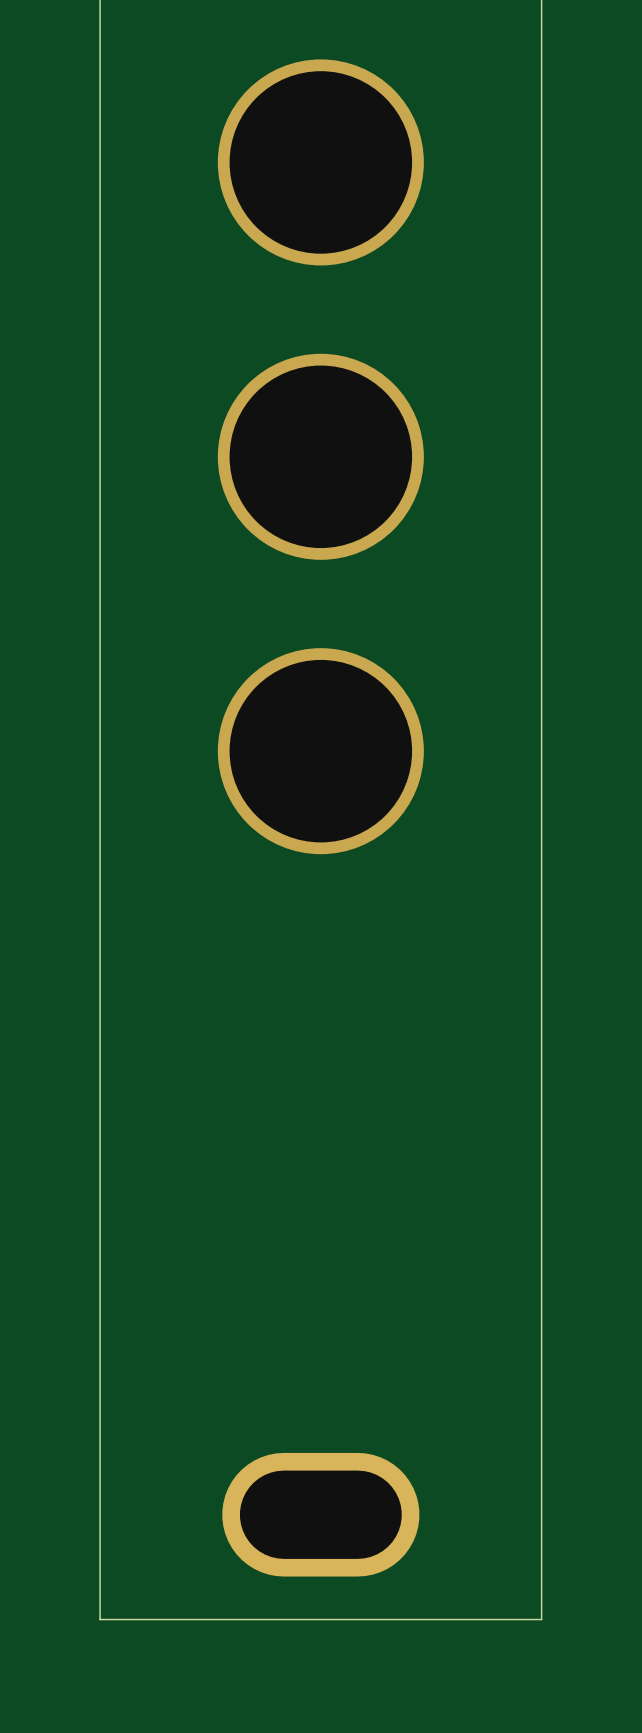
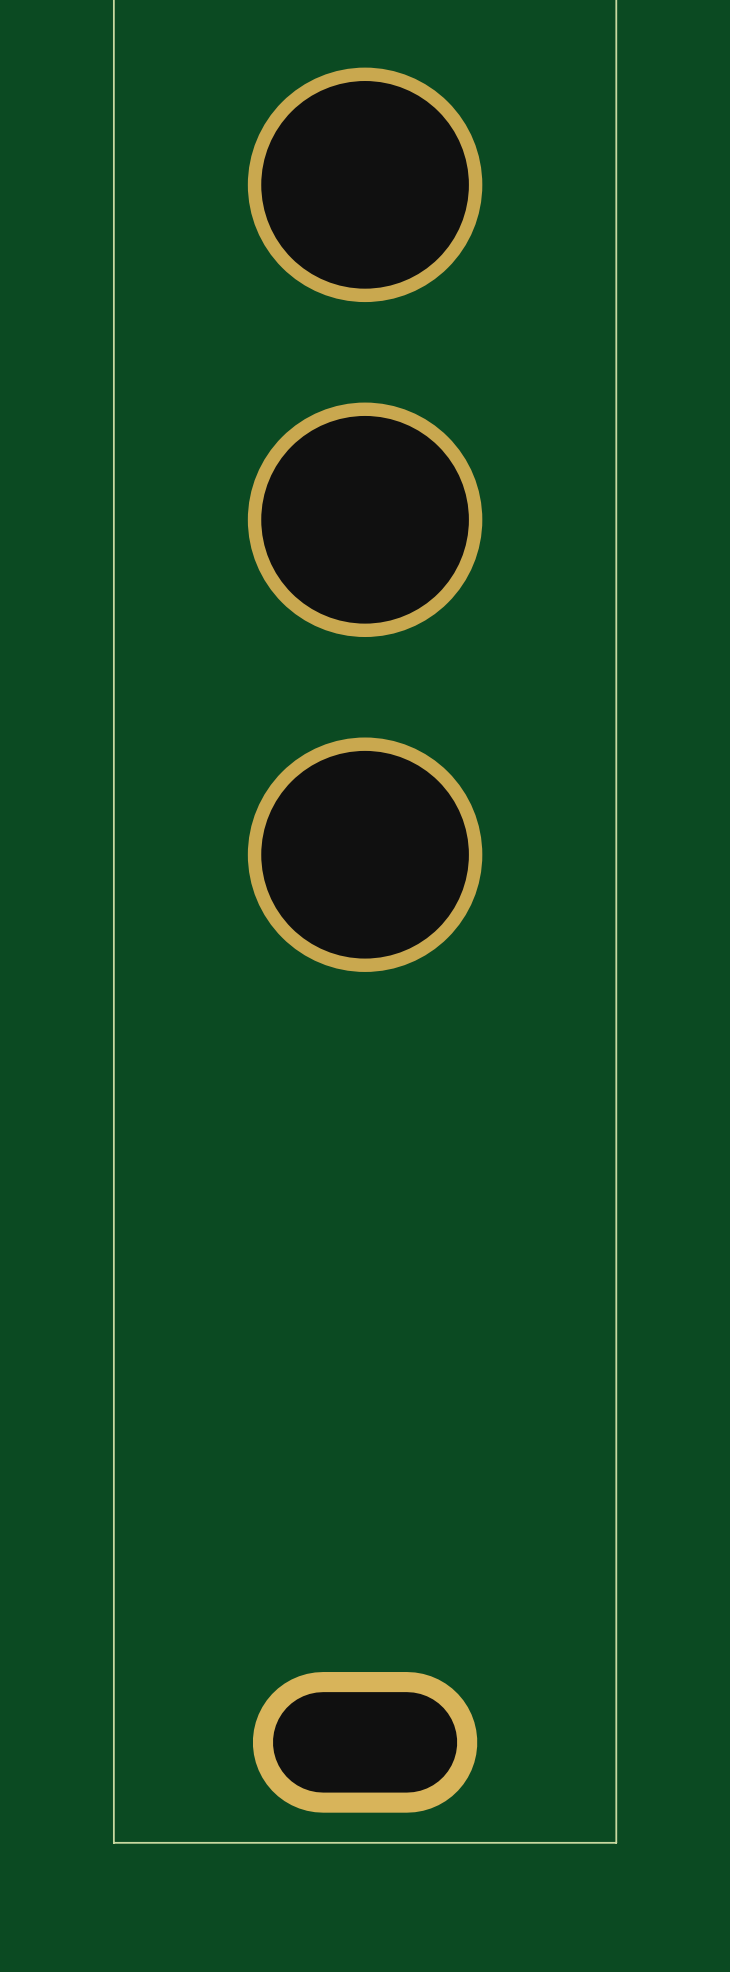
part position: (320, 1514) -> (365, 1742)

